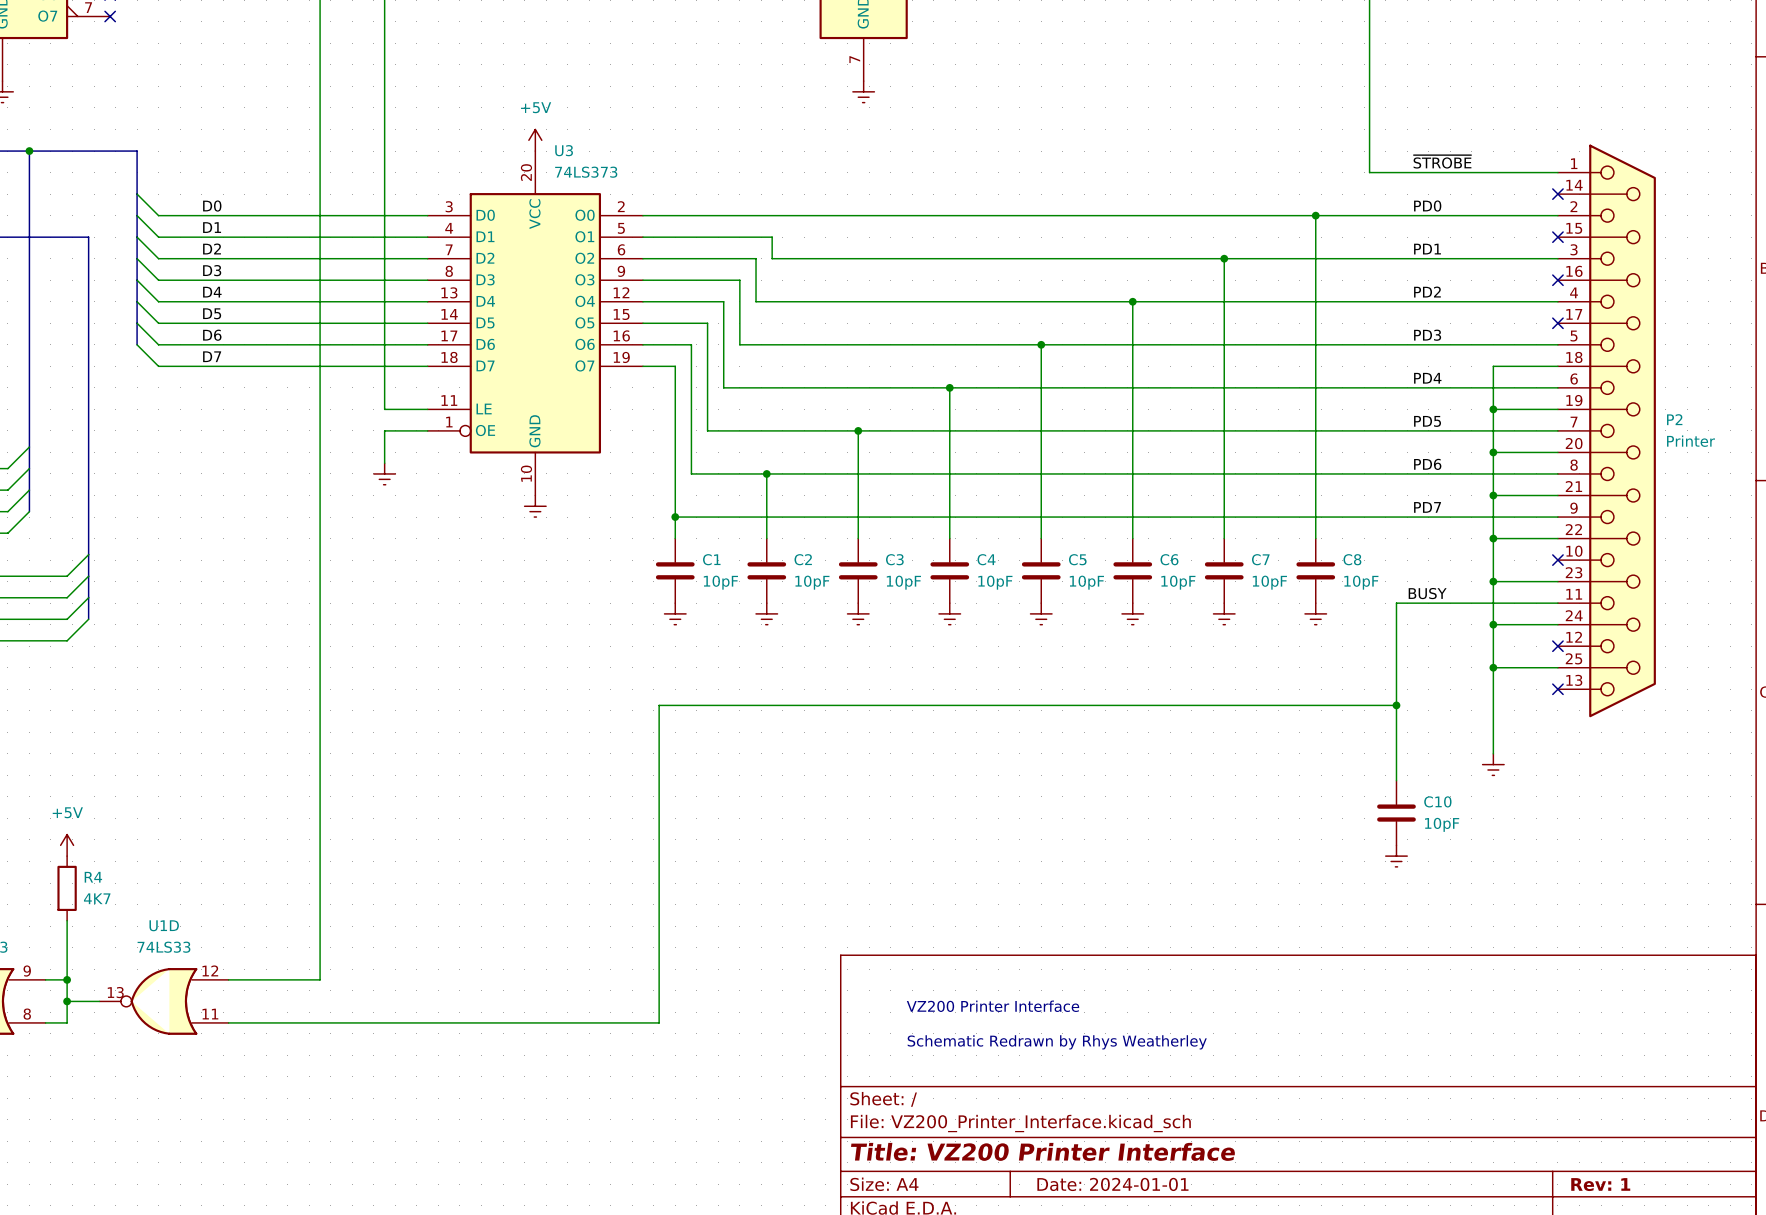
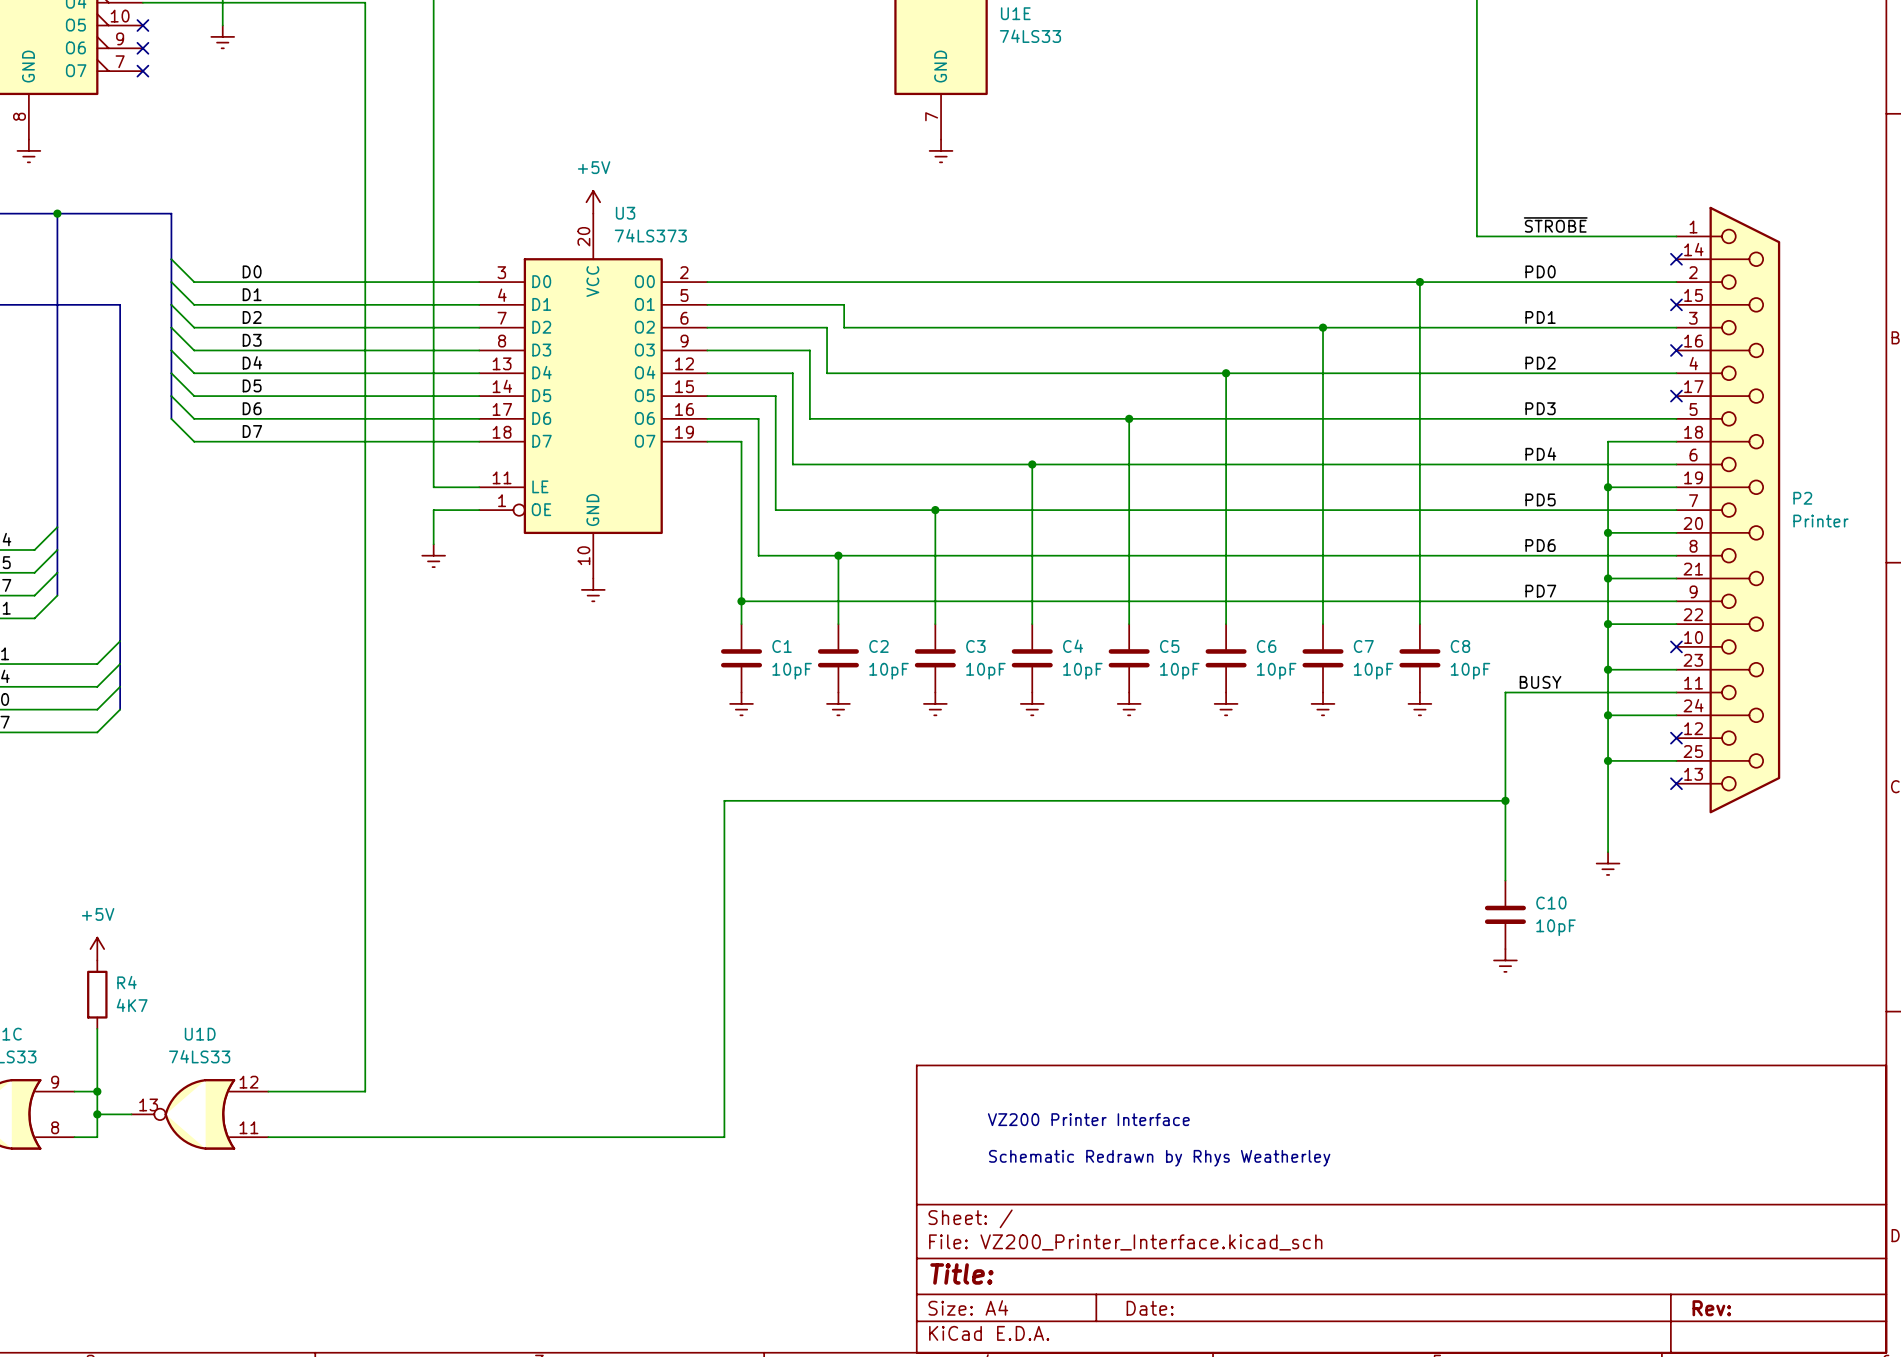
title block: Title: VZ200 Printer Interface (1043, 1151) -> Title: (961, 1273)
title block: Date: 2024-01-01 (1112, 1184) -> Date: (1150, 1308)
title block: Rev: 1 (1600, 1184) -> Rev: (1711, 1308)

